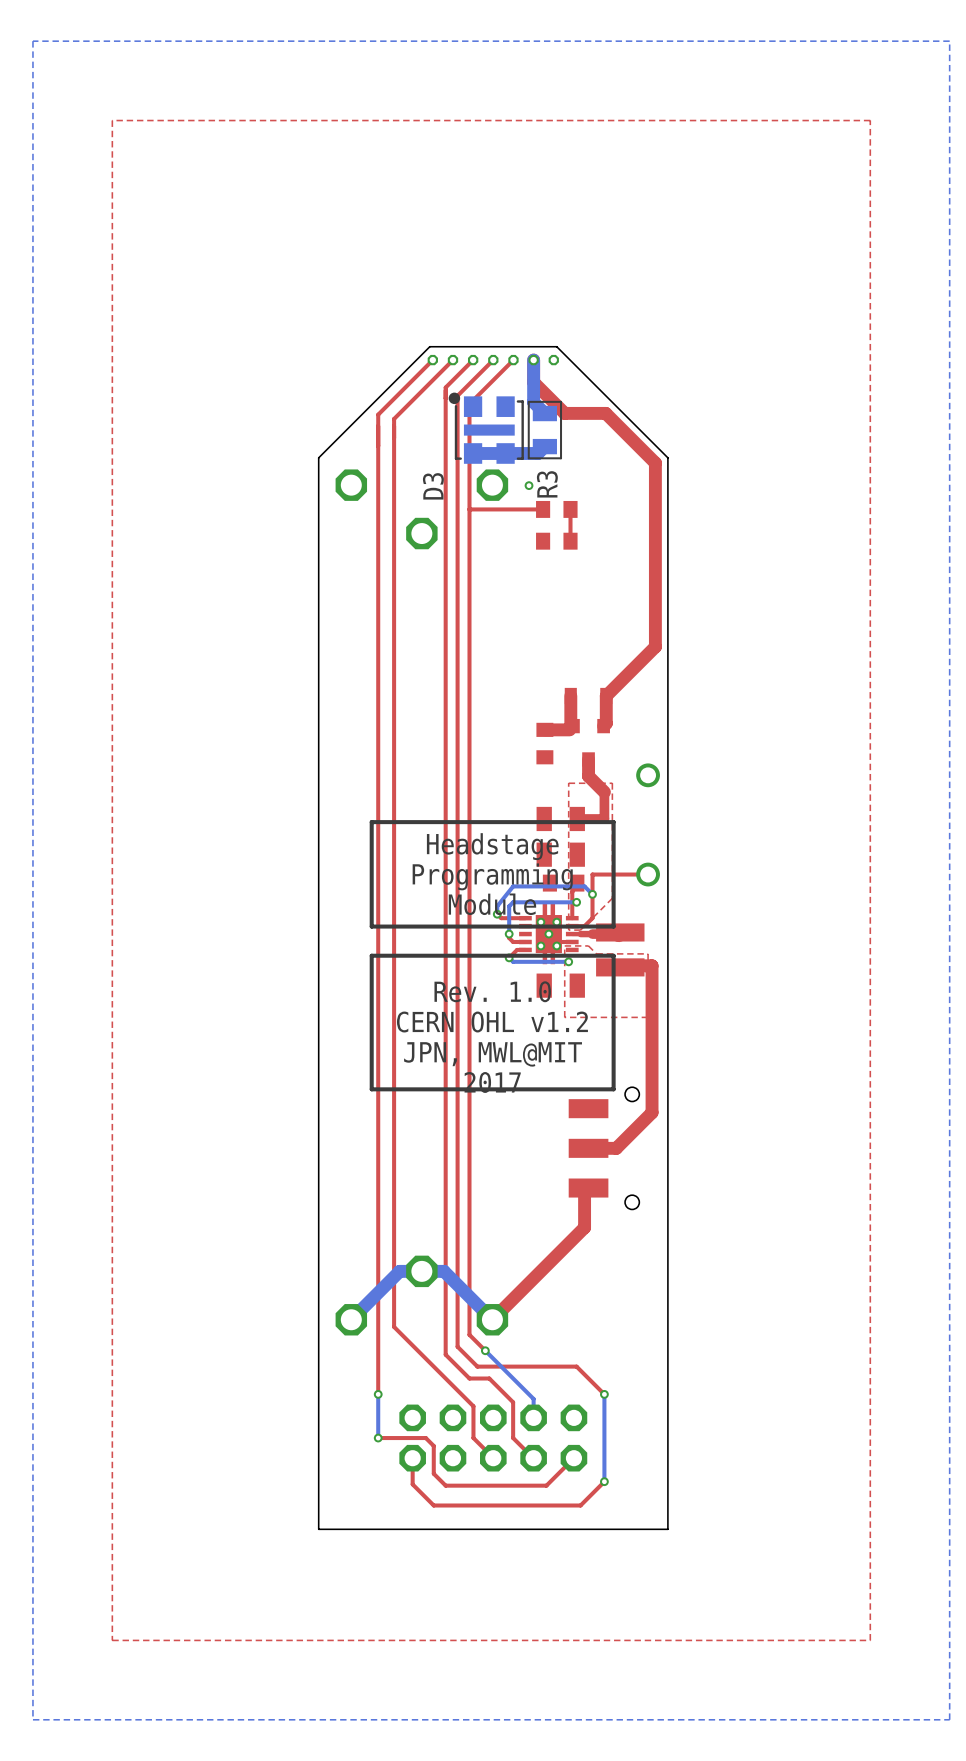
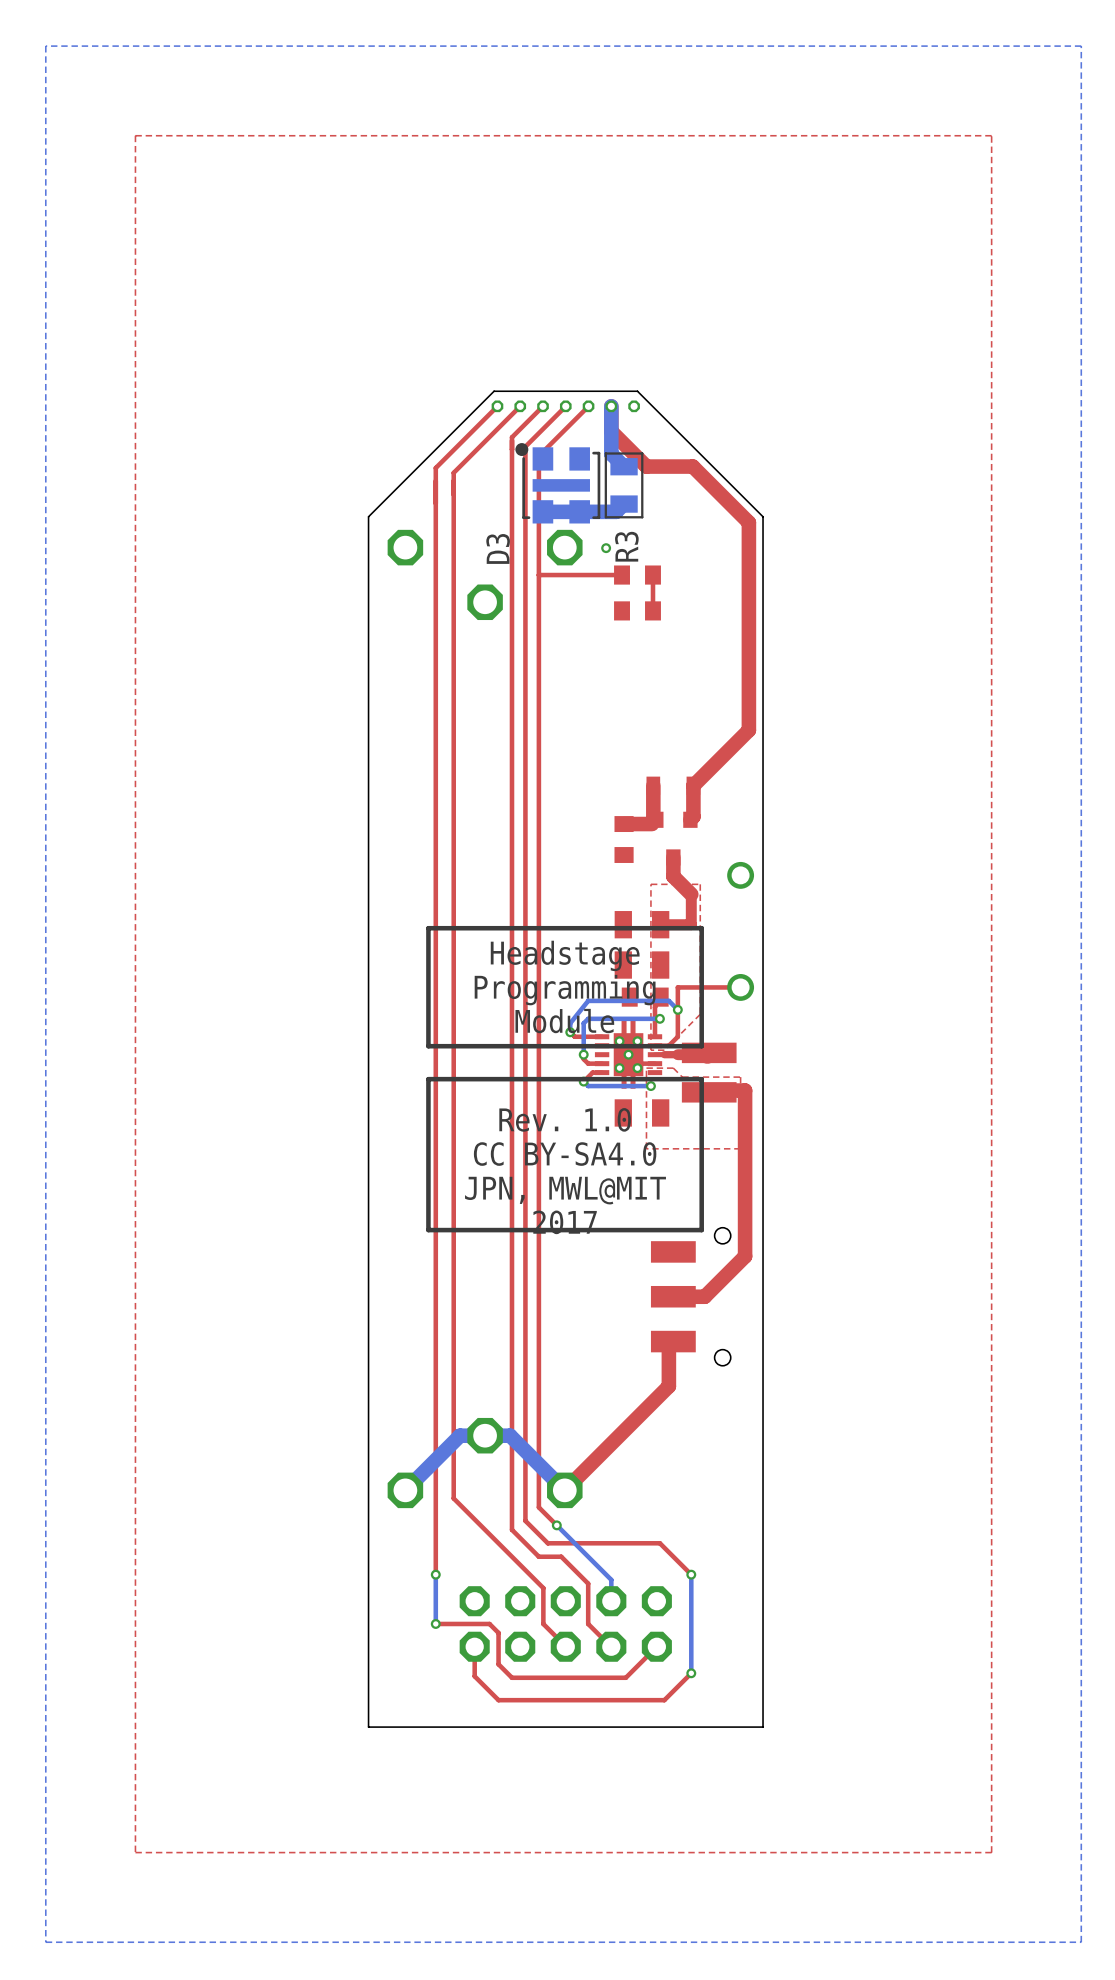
text: CERN OHL v1.2 (492, 1022) -> CC BY-SA4.0 (565, 1154)

